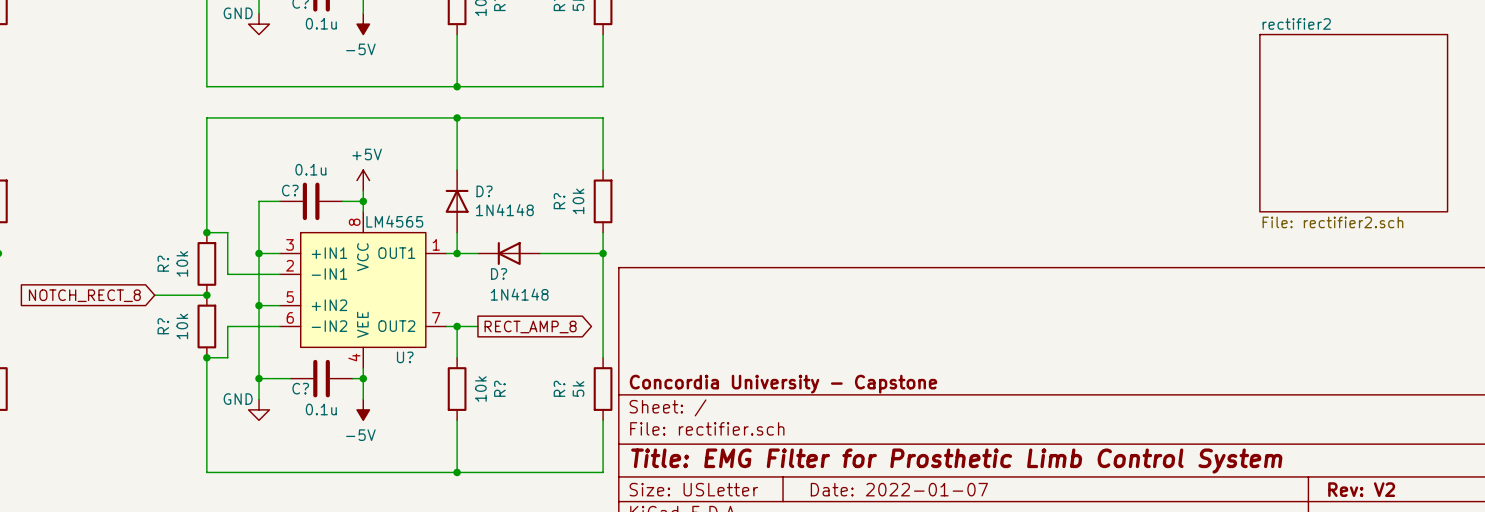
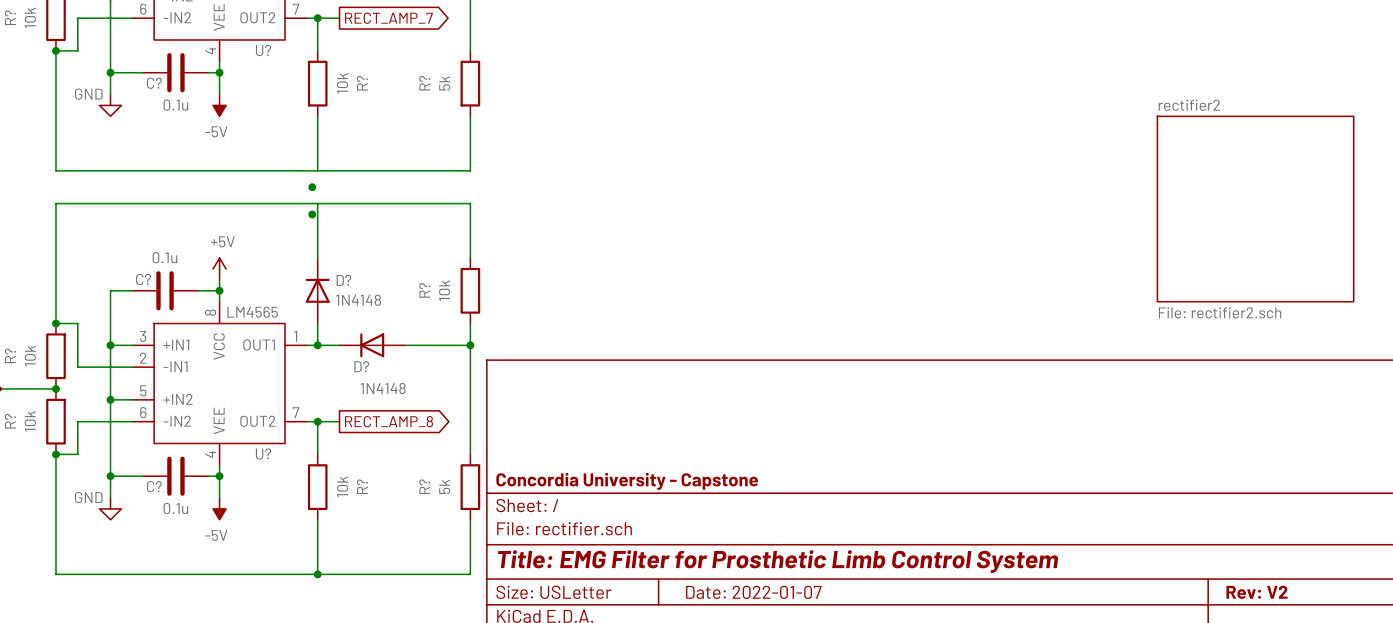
junction: (457, 86) -> none
junction: none -> (312, 187)
junction: (457, 117) -> none
junction: none -> (312, 214)

